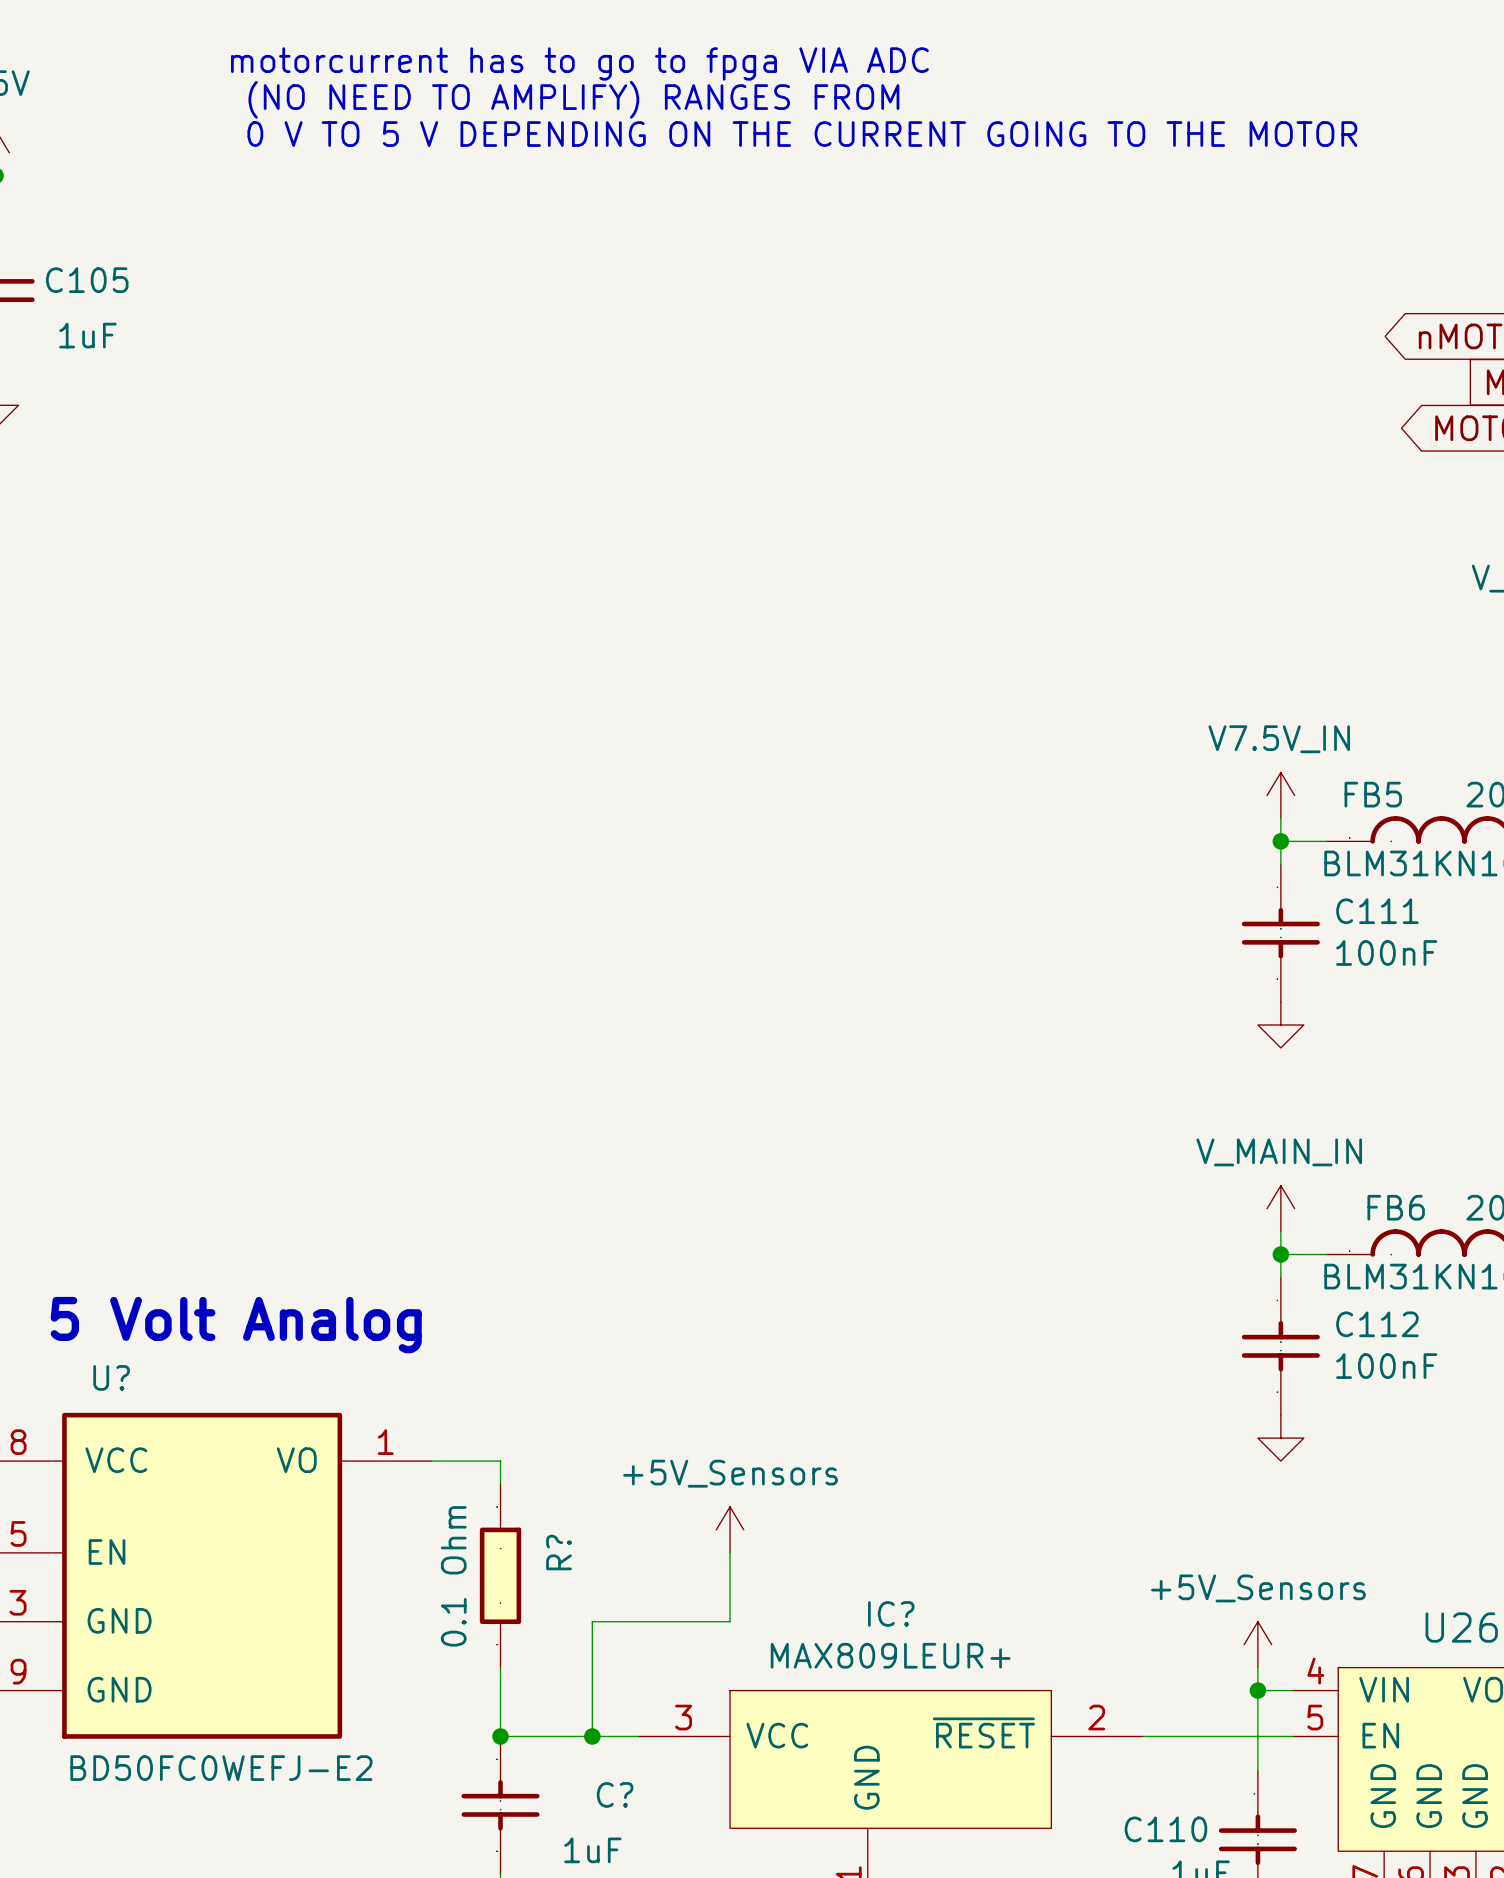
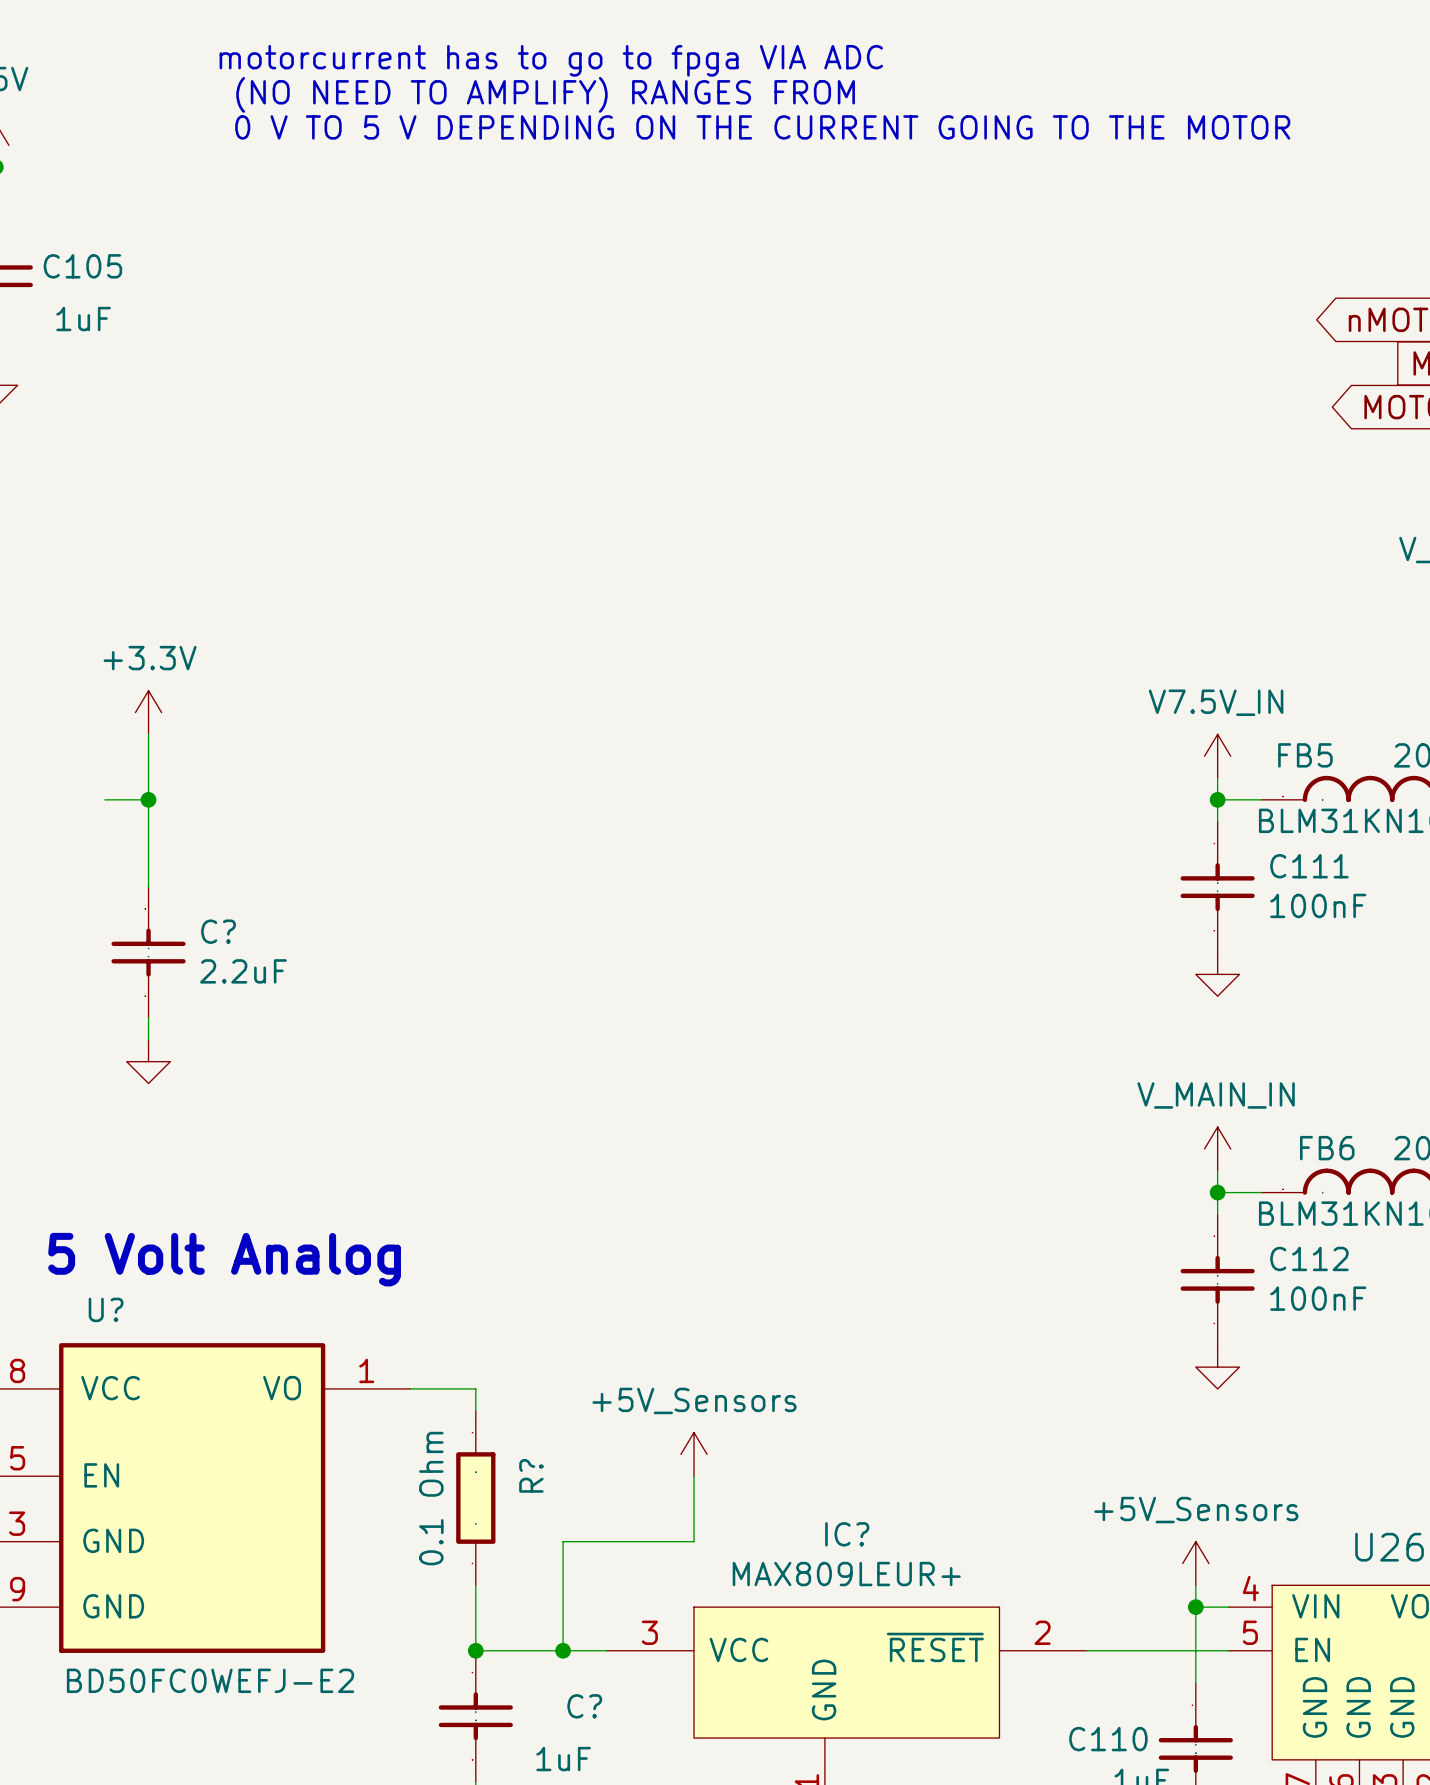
power symbol: none -> +3.3V (148, 712)
wire: none -> (148, 734) (148, 887)
wire: none -> (104, 799) (148, 799)
junction: none -> (148, 799)
C?: none -> (148, 952)
wire: none -> (148, 1018) (148, 1039)
power symbol: none -> (148, 1061)

